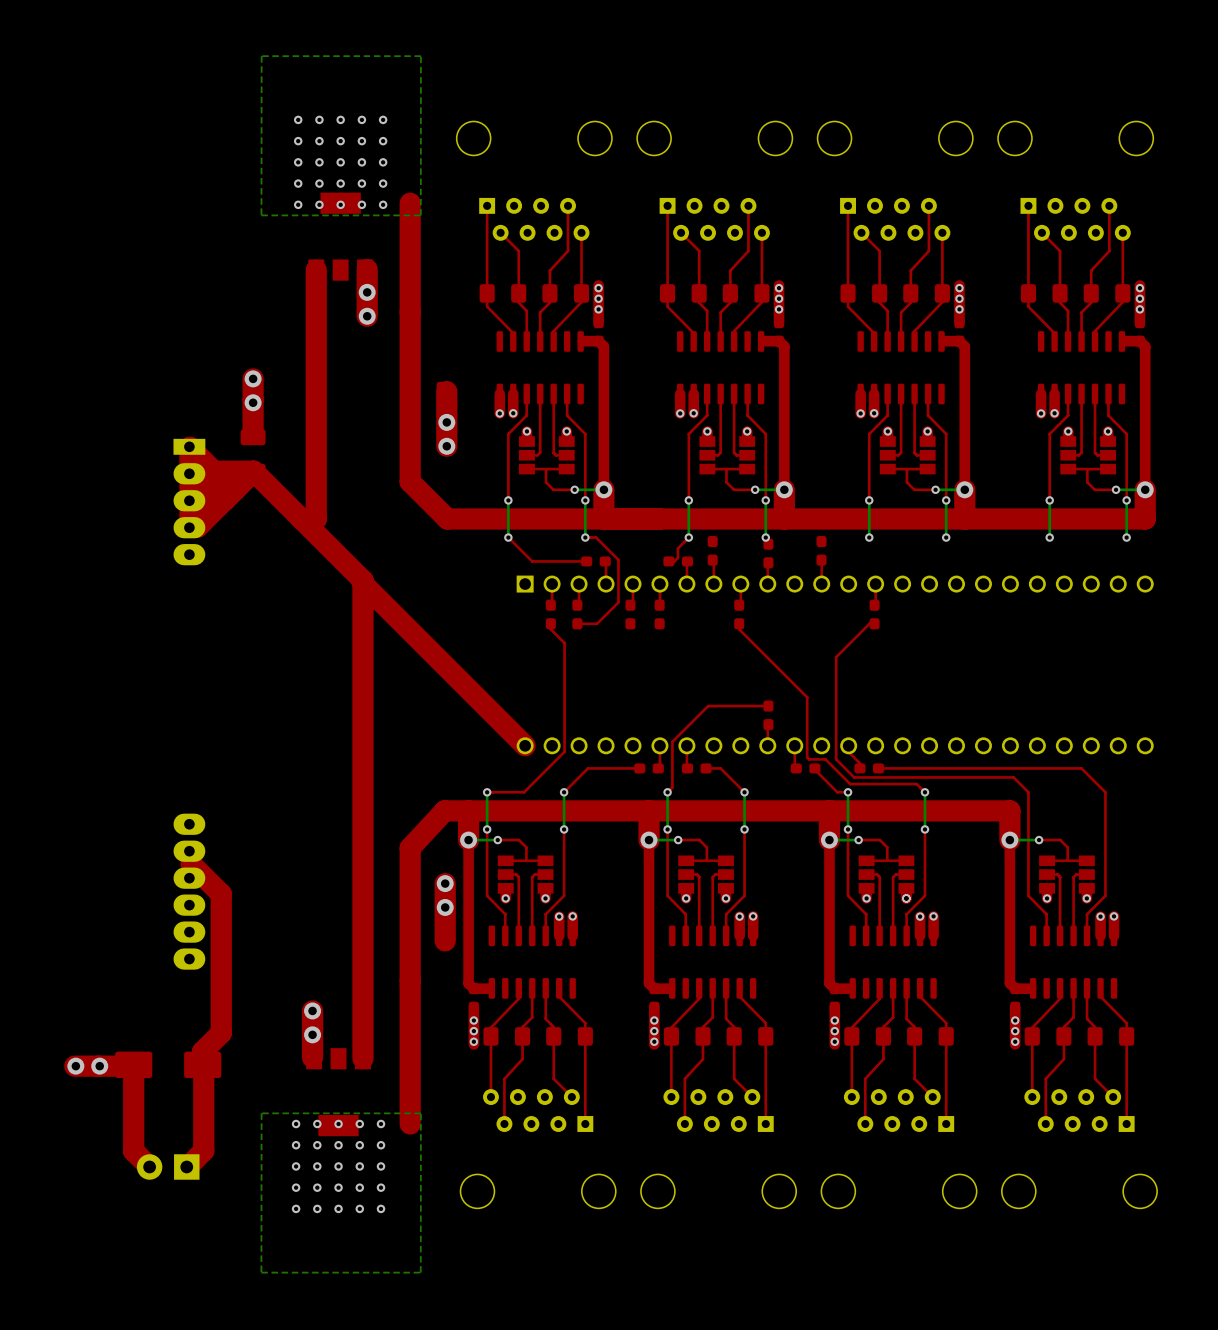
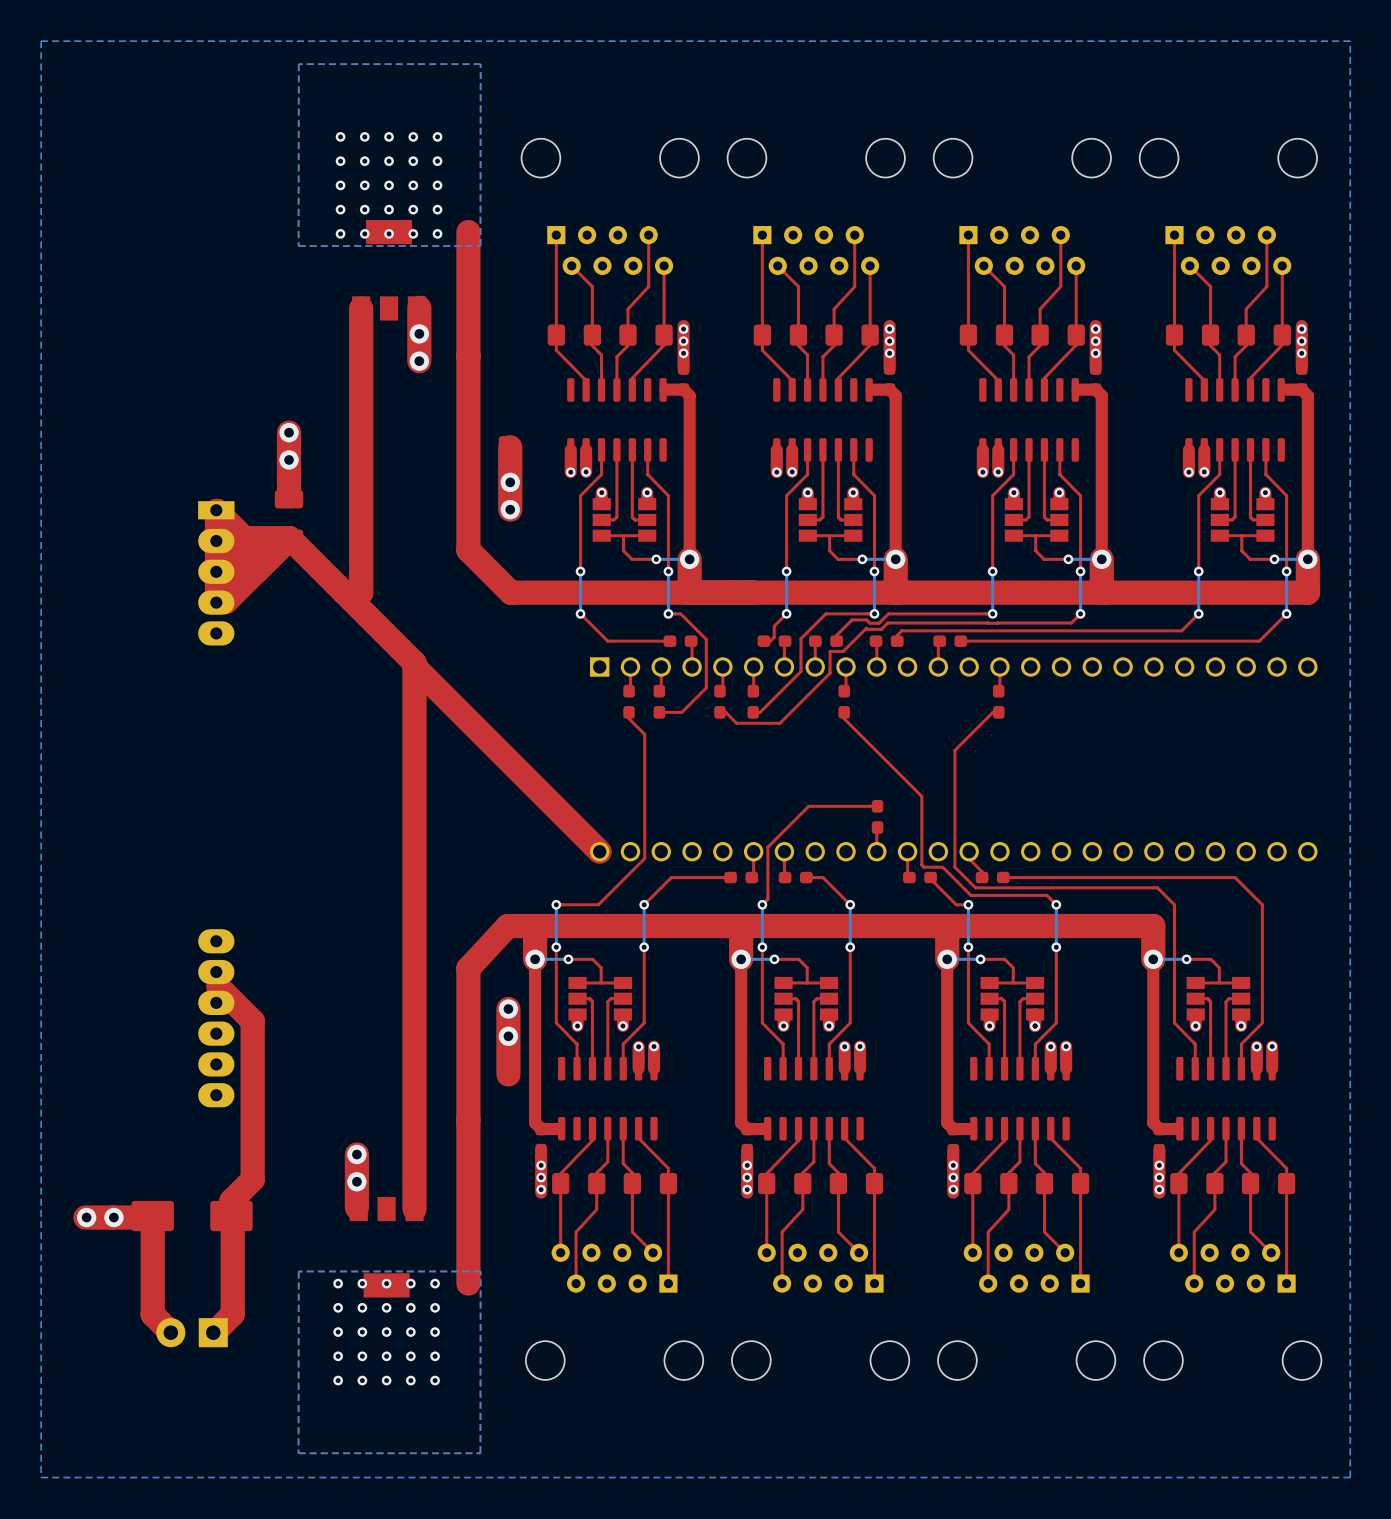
bottom zone outline: none -> (1350, 41) (1350, 1477) (41, 1477) (41, 41) (1350, 41)
top track: none -> (874, 613) (825, 613) (800, 638) (800, 671) (760, 712) (753, 712)
top track: none -> (992, 613) (888, 613) (879, 623) (869, 623) (866, 619) (852, 619) (836, 635) (836, 641)
top track: none -> (1080, 613) (1071, 622) (887, 622) (881, 629) (866, 628) (843, 651) (830, 651) (830, 673) (780, 723) (736, 723) (725, 712) (719, 712)
top track: none -> (1198, 613) (1181, 630) (901, 630) (897, 635) (897, 641)
top track: none -> (1286, 613) (1259, 641) (960, 641)
part rotation: 0° (712, 550) -> 90° clockwise (826, 641)
part rotation: 0° (821, 550) -> 90° clockwise (950, 641)
part rotation: 0° (768, 553) -> 90° clockwise (886, 641)

